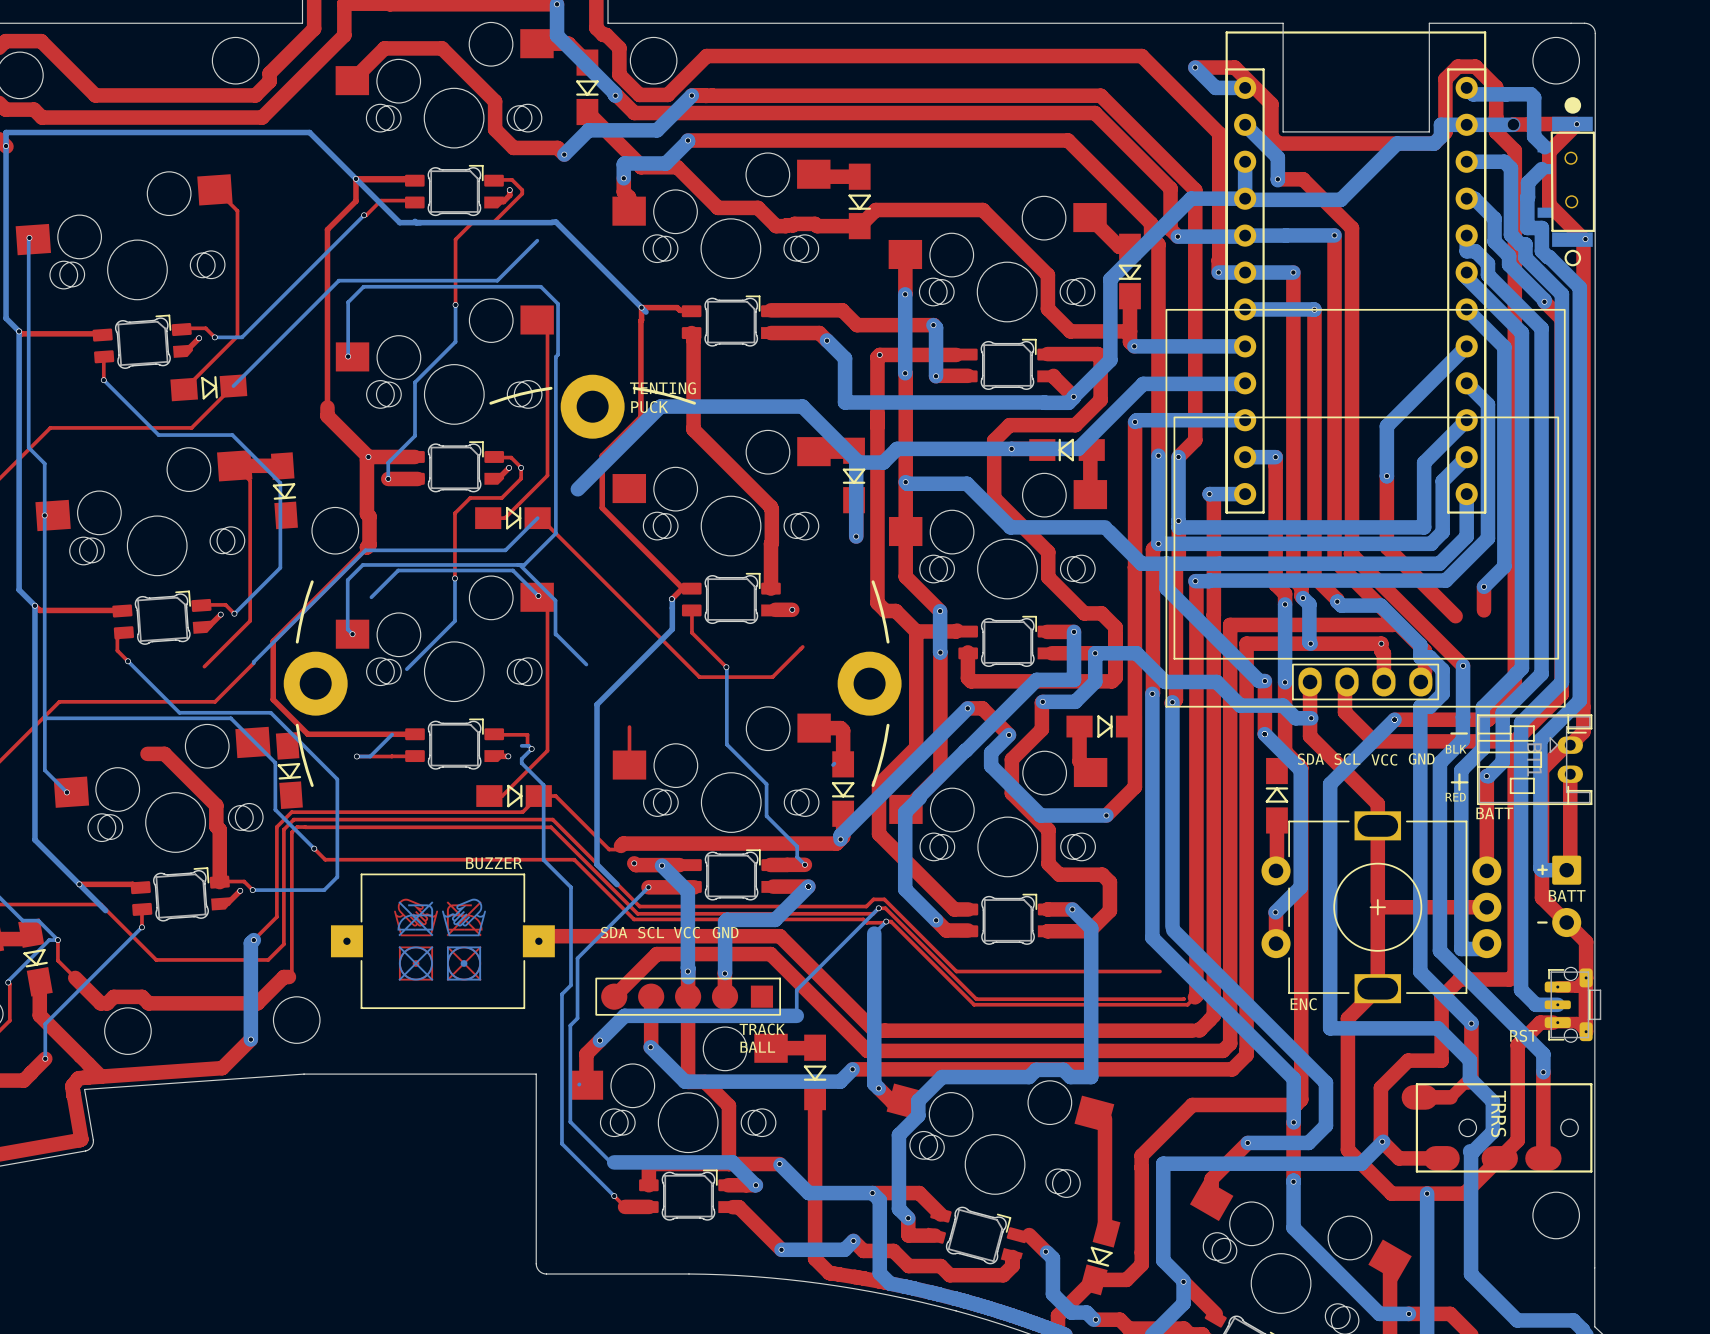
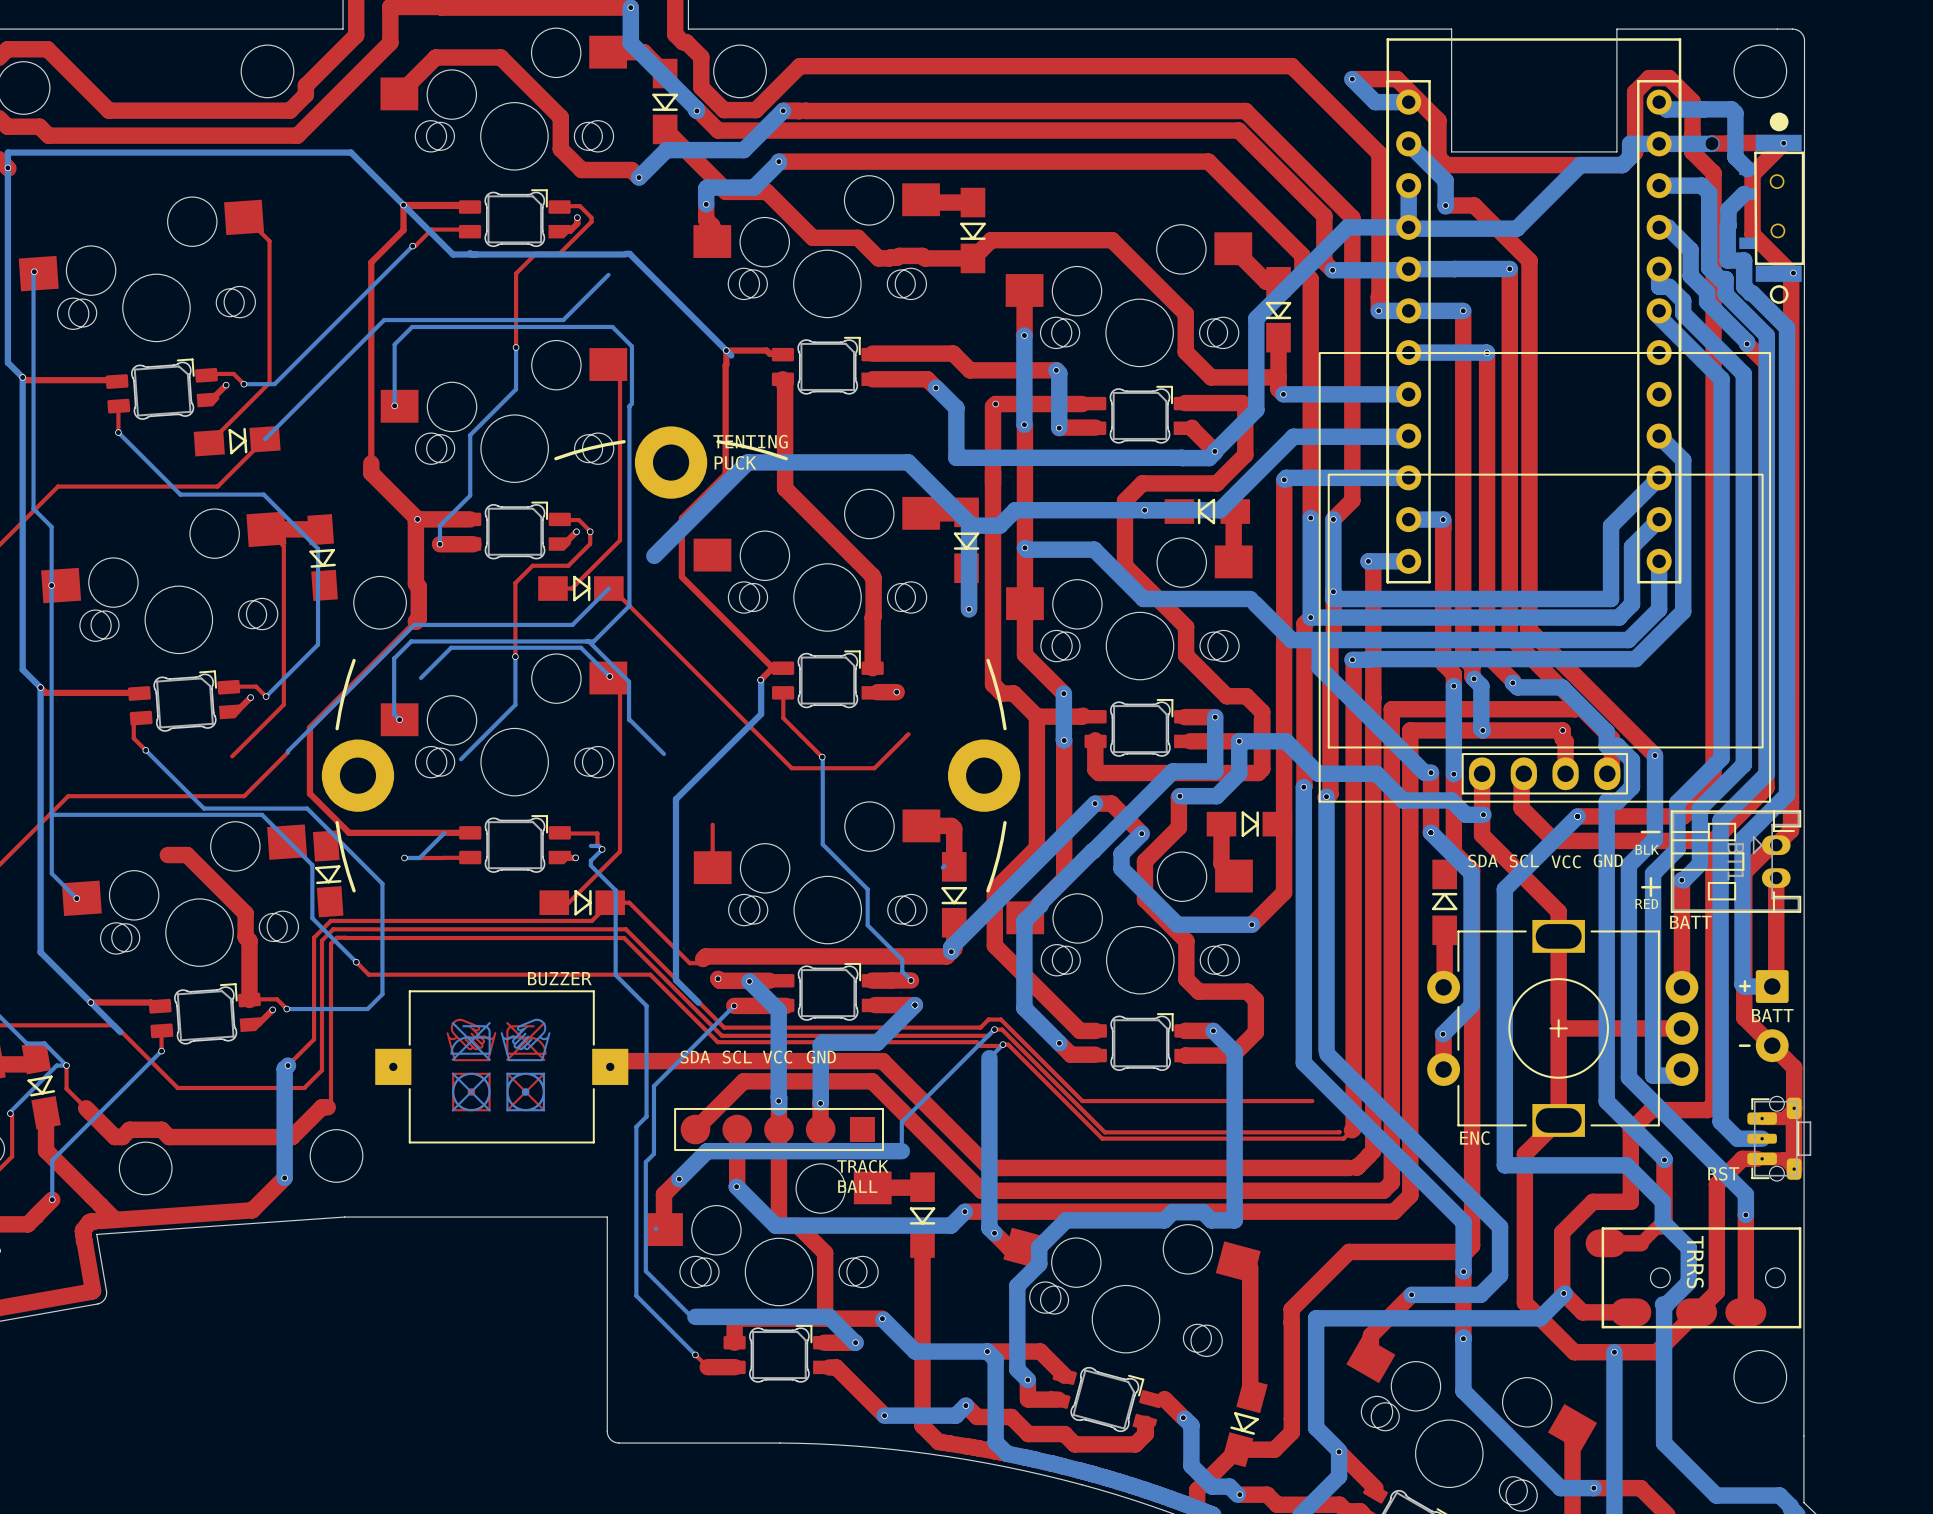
bottom track: (1466, 309) (1504, 347) (1504, 566) (1483, 586) -> none
bottom track: (1466, 346) (1386, 426) (1386, 476) -> none
top track: (1386, 476) (1386, 547) (1455, 616) -> none
via: (1386, 476) -> none
top track: (1483, 586) (1483, 610) -> none
via: (1483, 586) -> none

